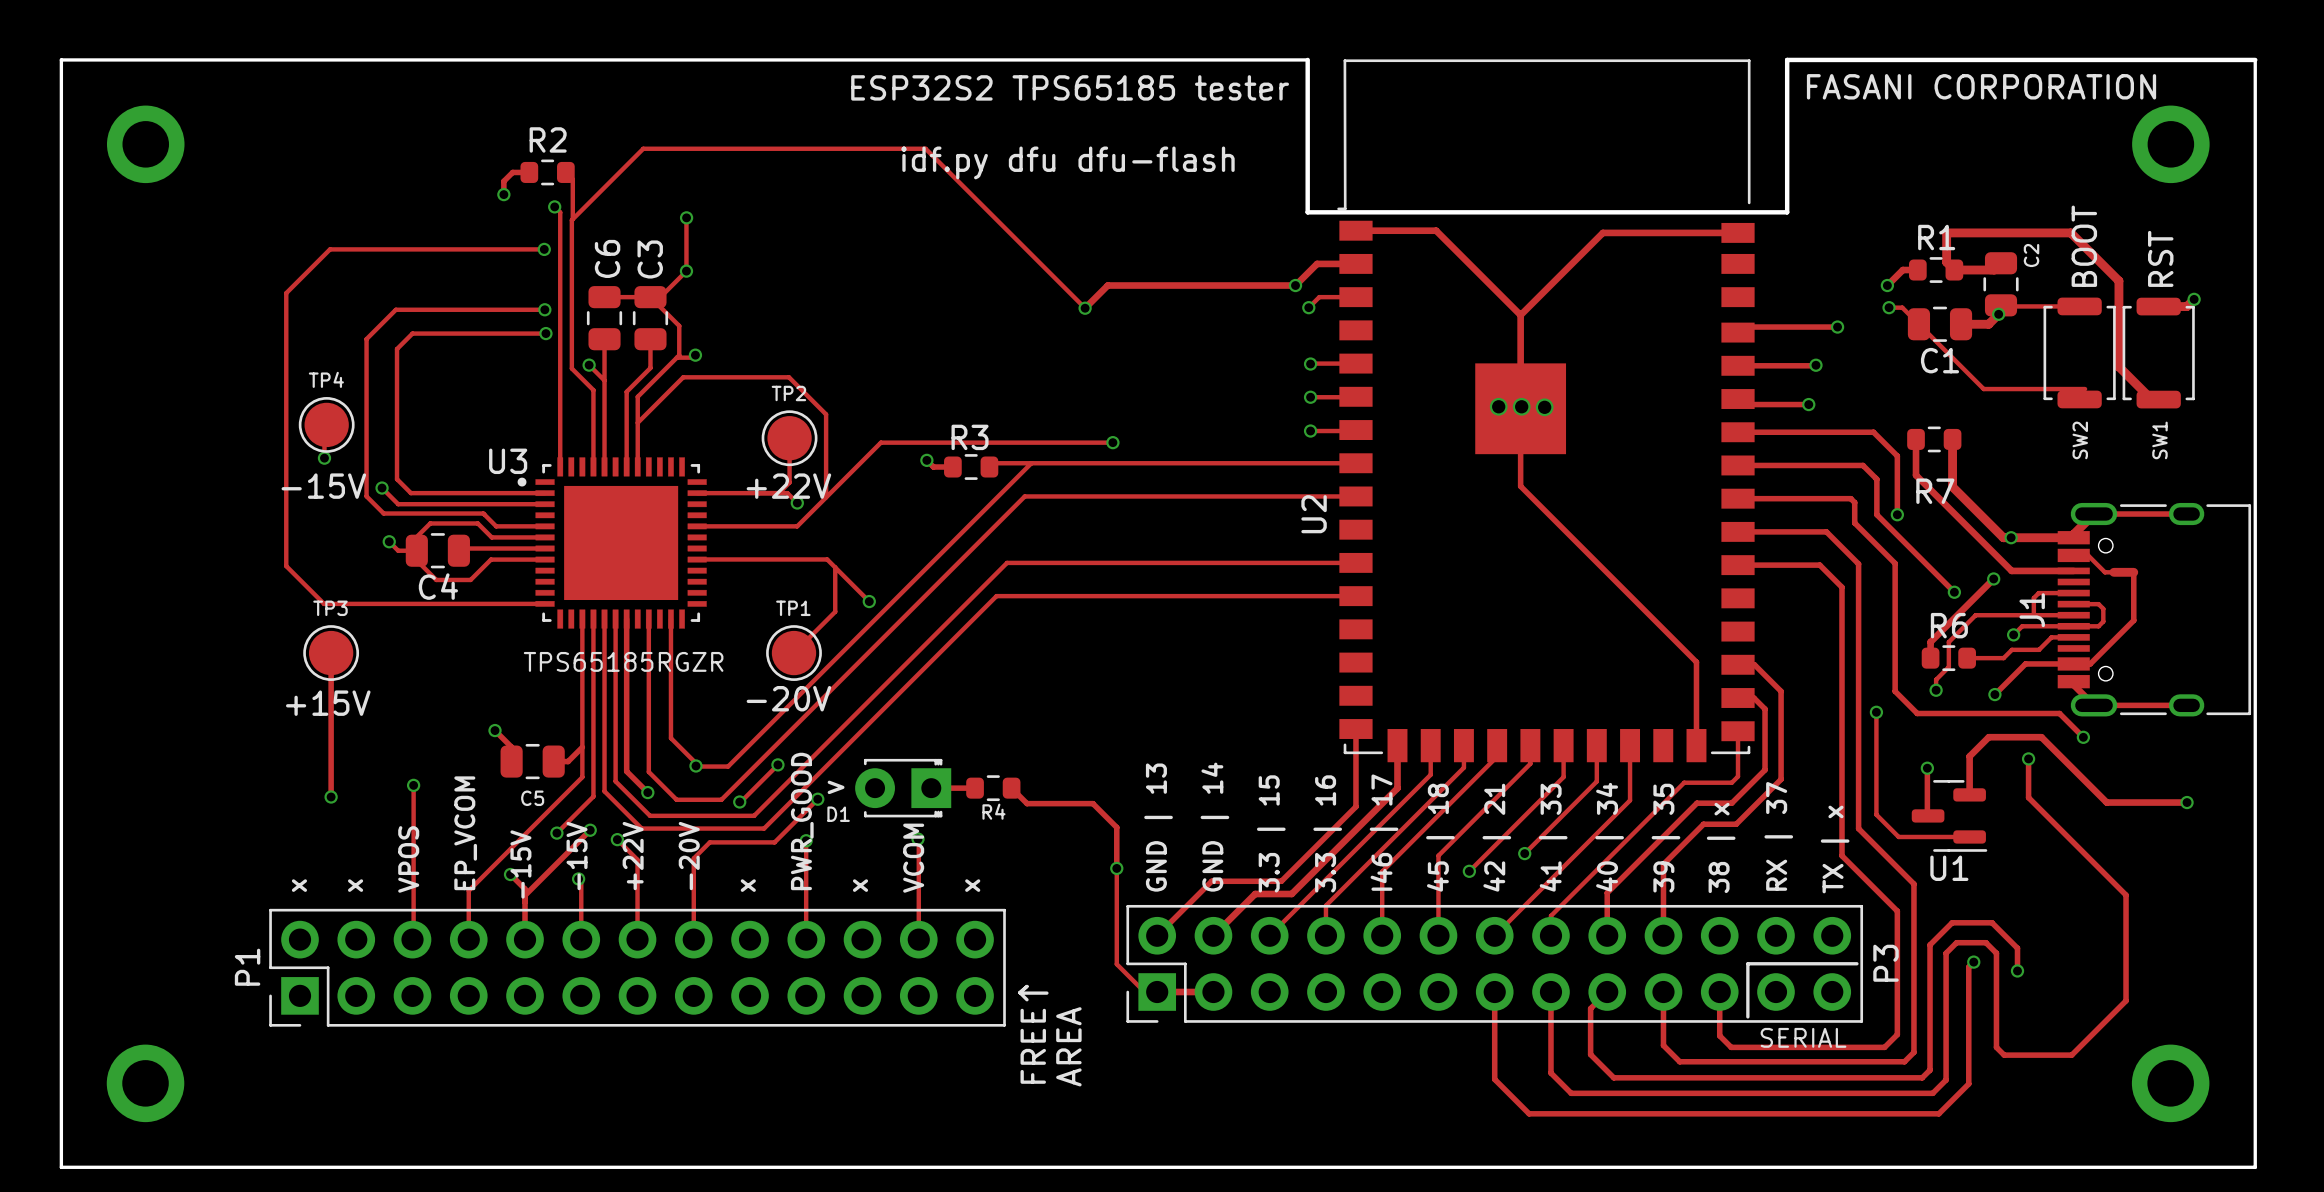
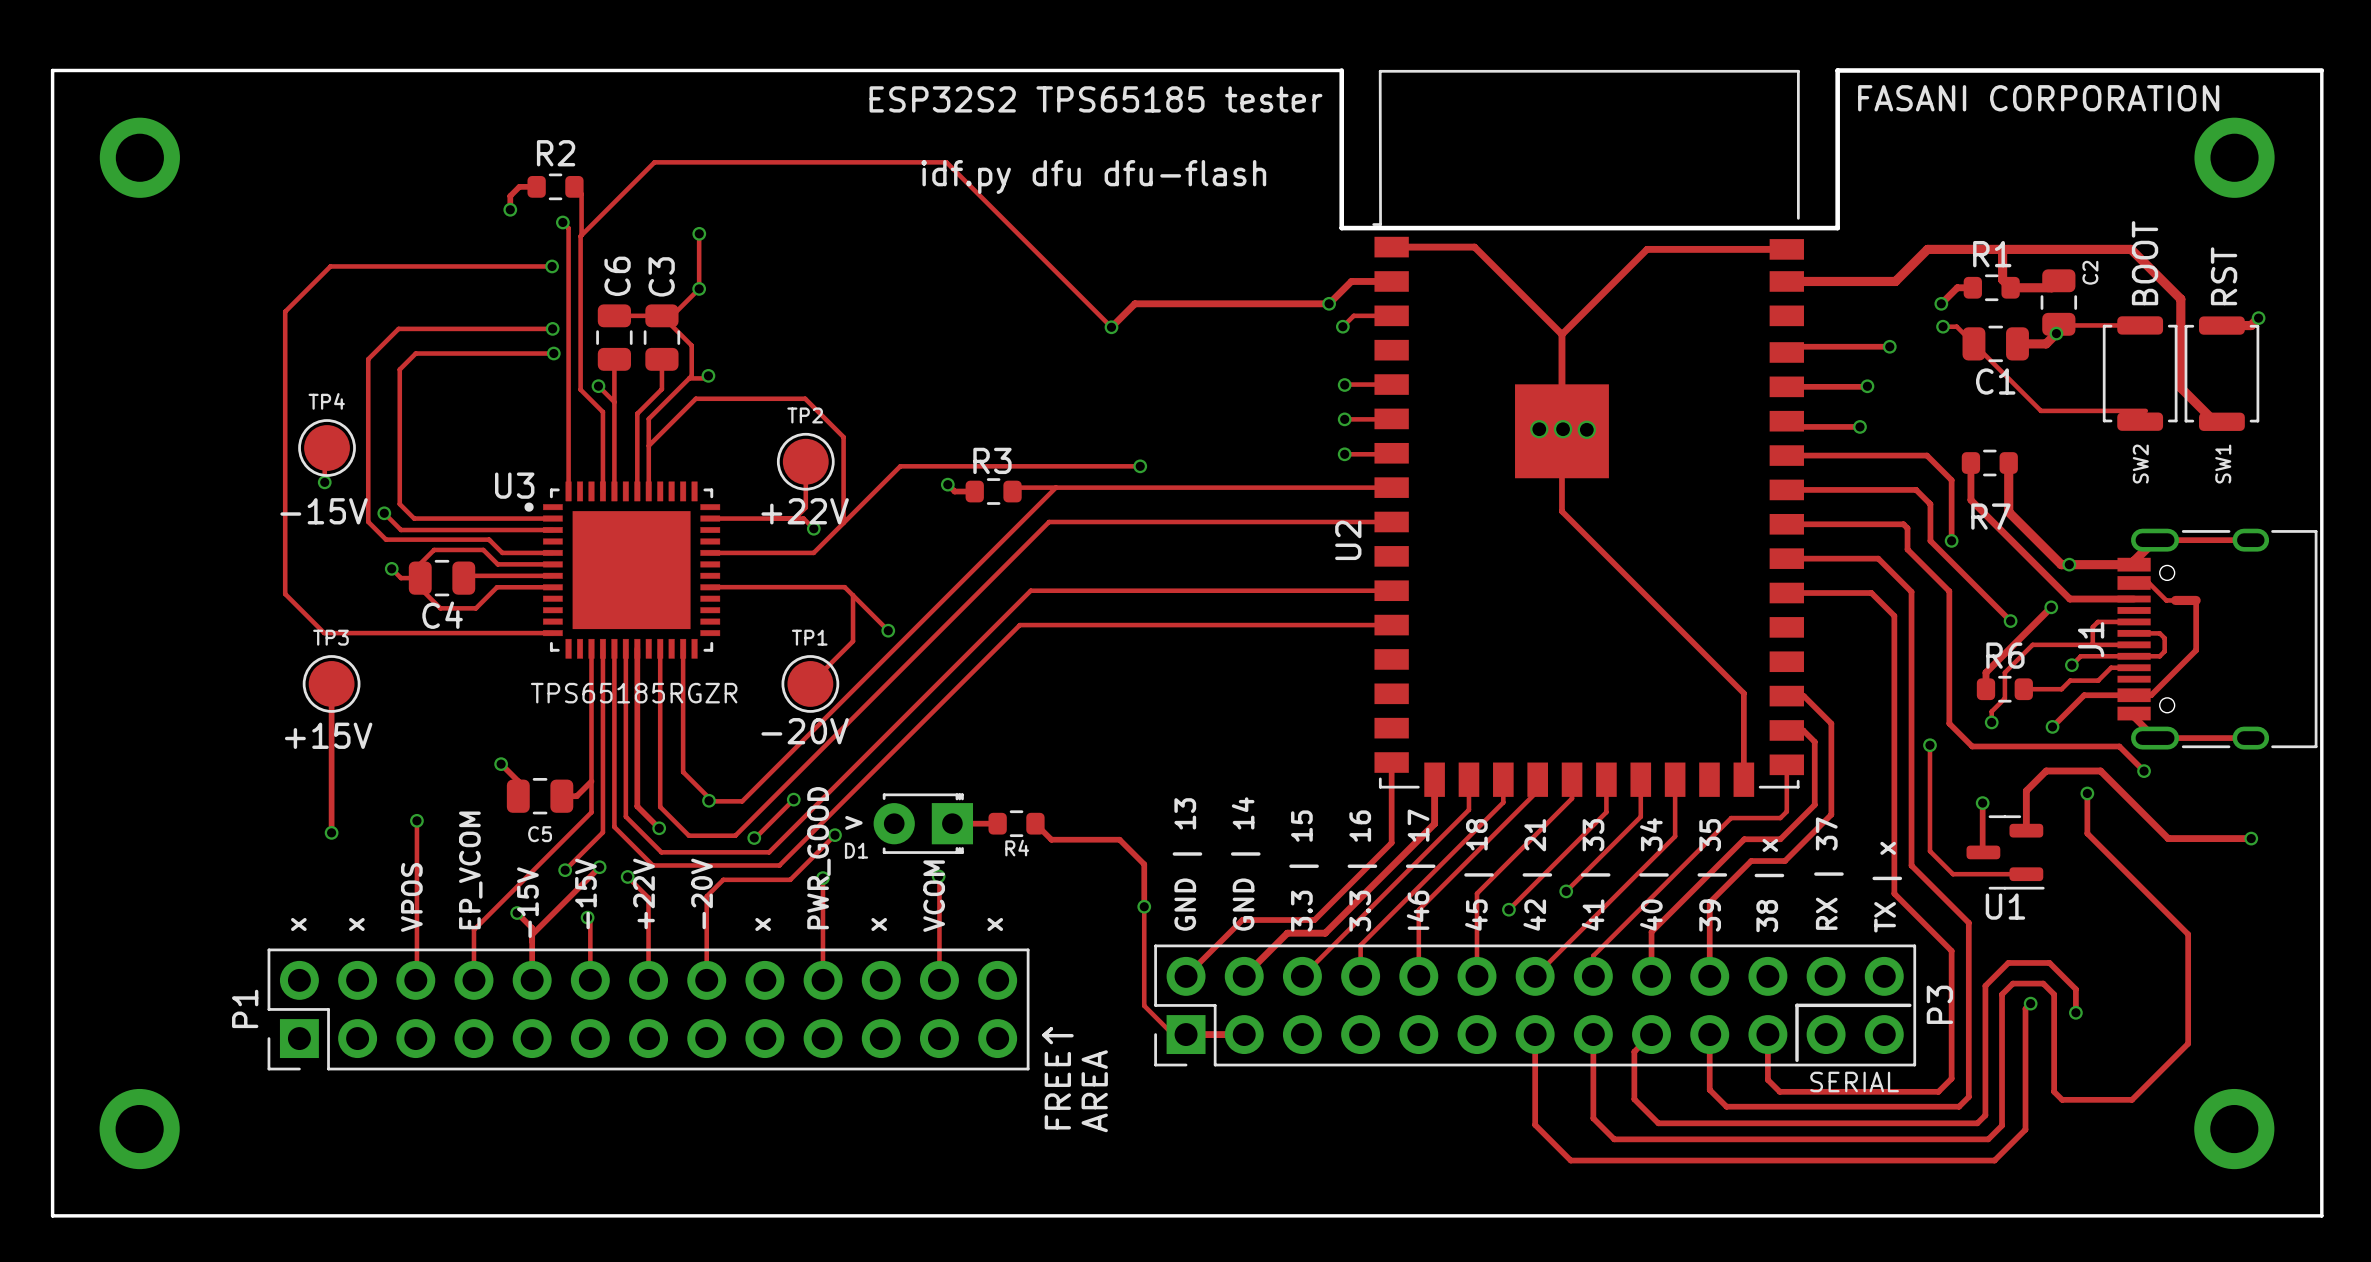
track: none -> (2002, 249) (1927, 249) (1895, 281) (1786, 281)

